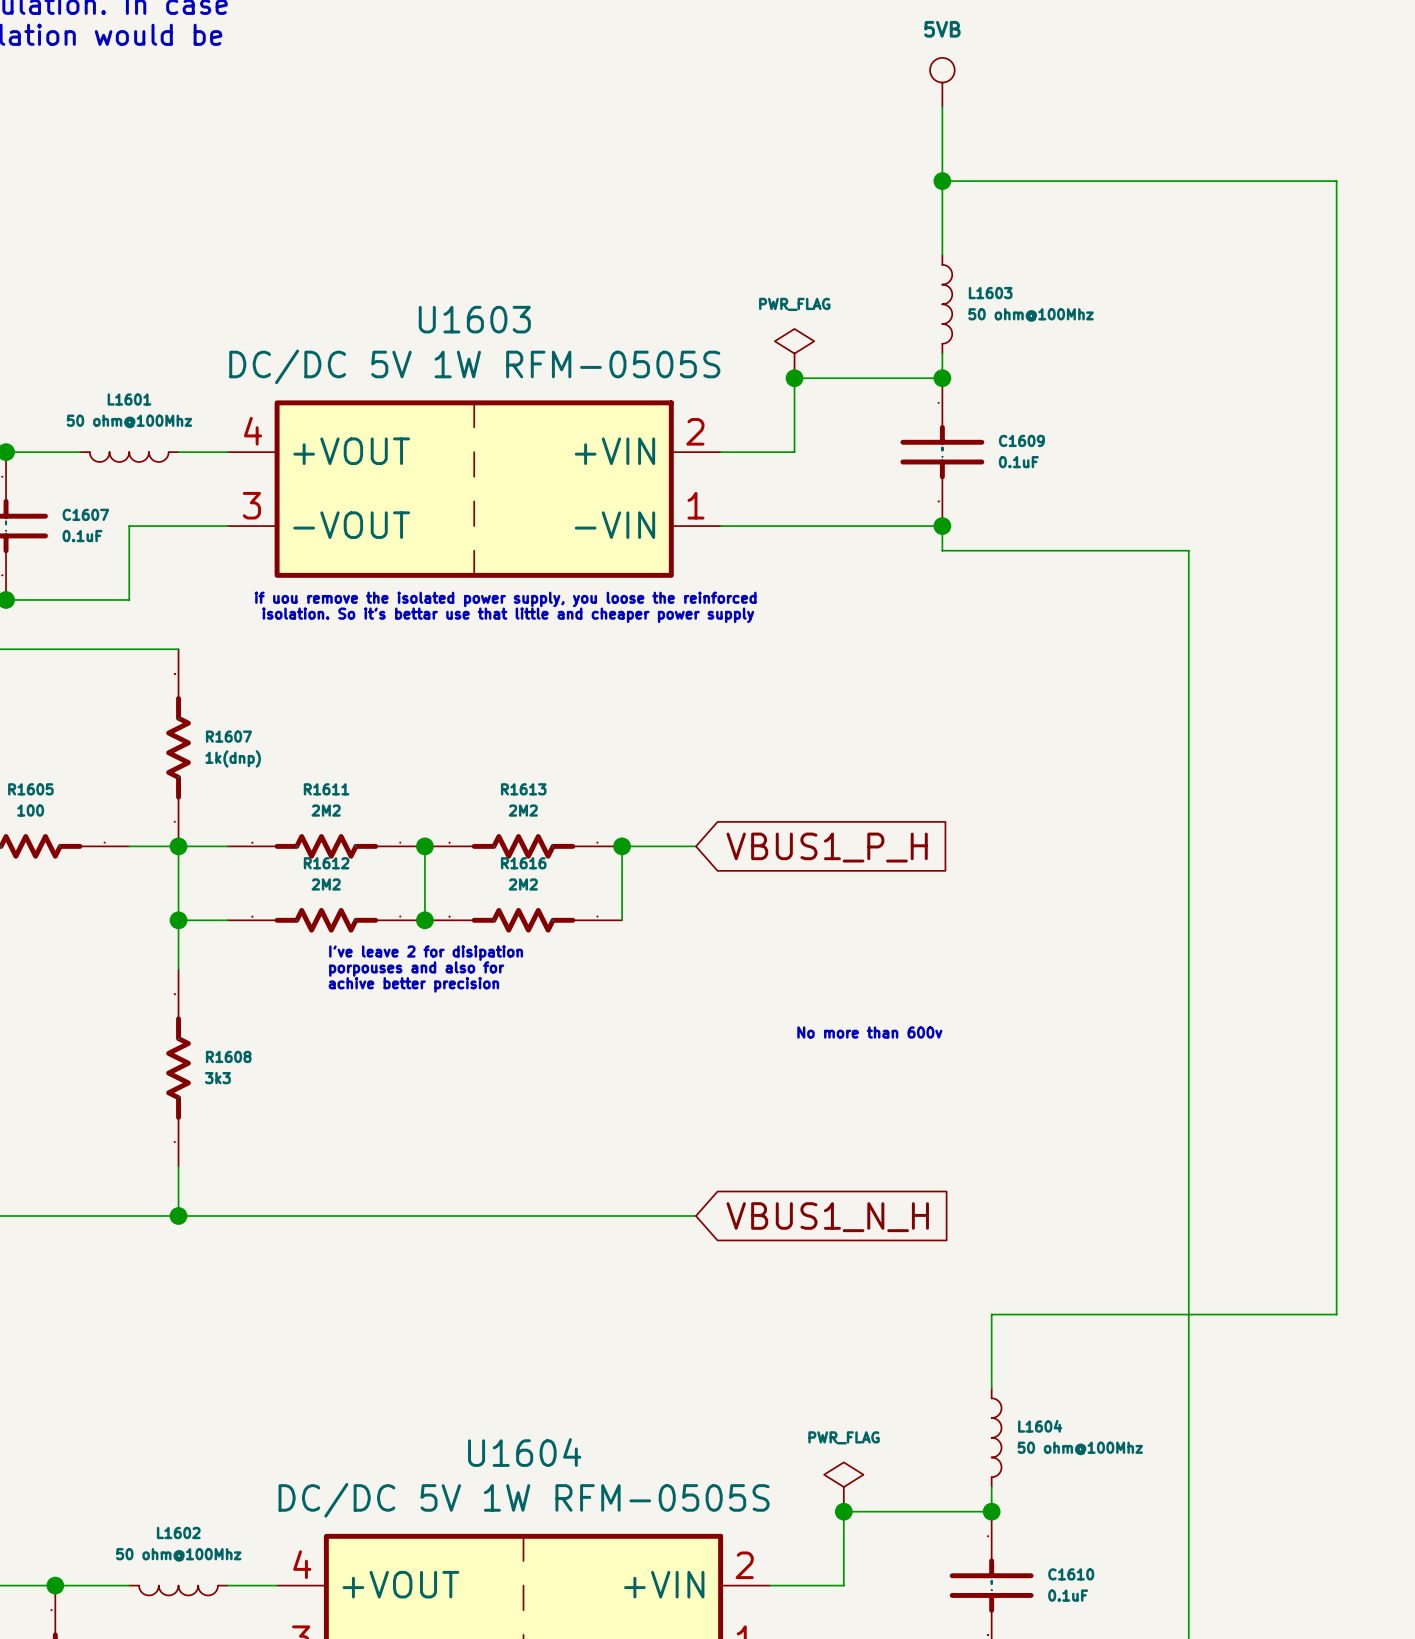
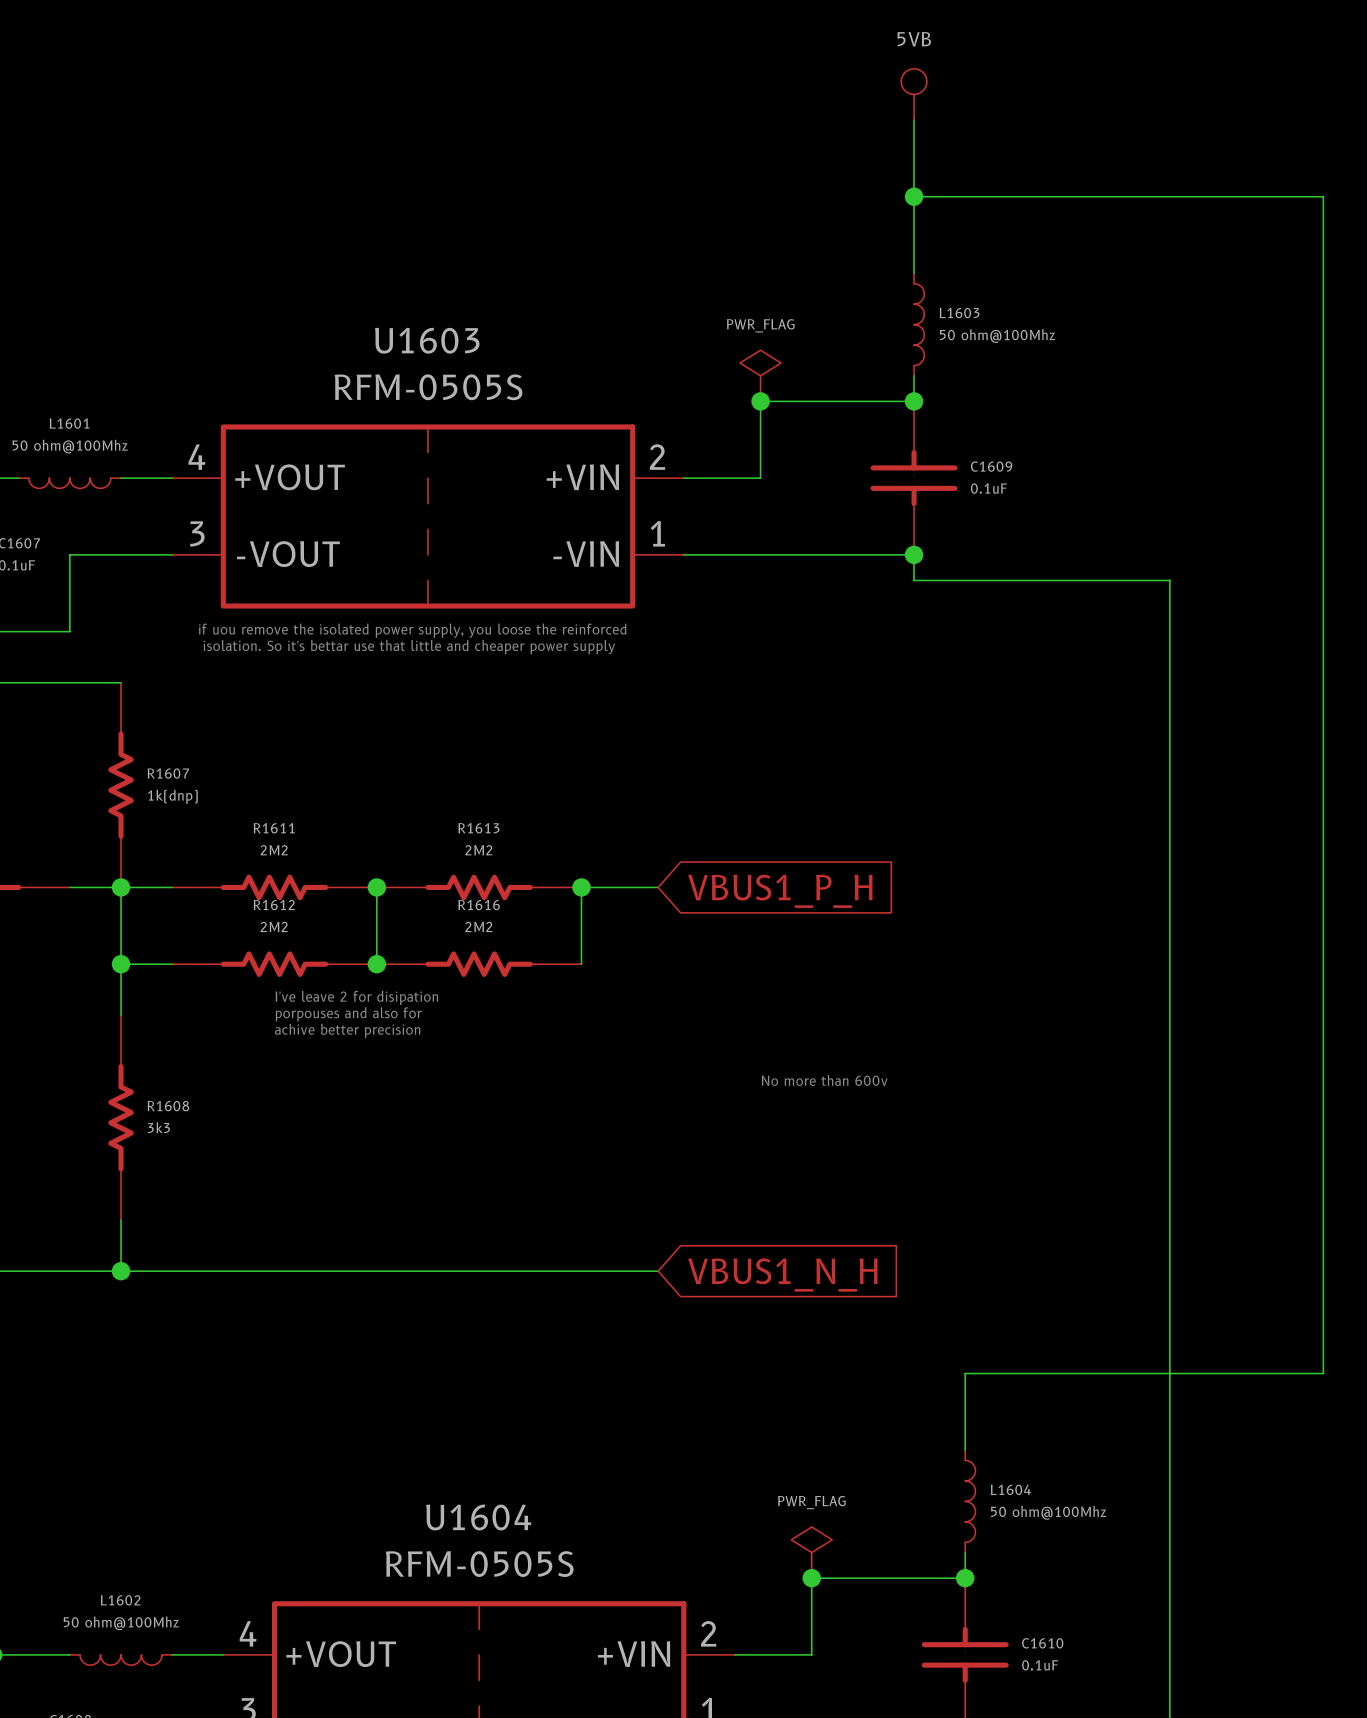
U1603 value: DC/DC 5V 1W RFM-0505S (474, 366) -> RFM-0505S (428, 387)
U1604 value: DC/DC 5V 1W RFM-0505S (524, 1500) -> RFM-0505S (479, 1564)

